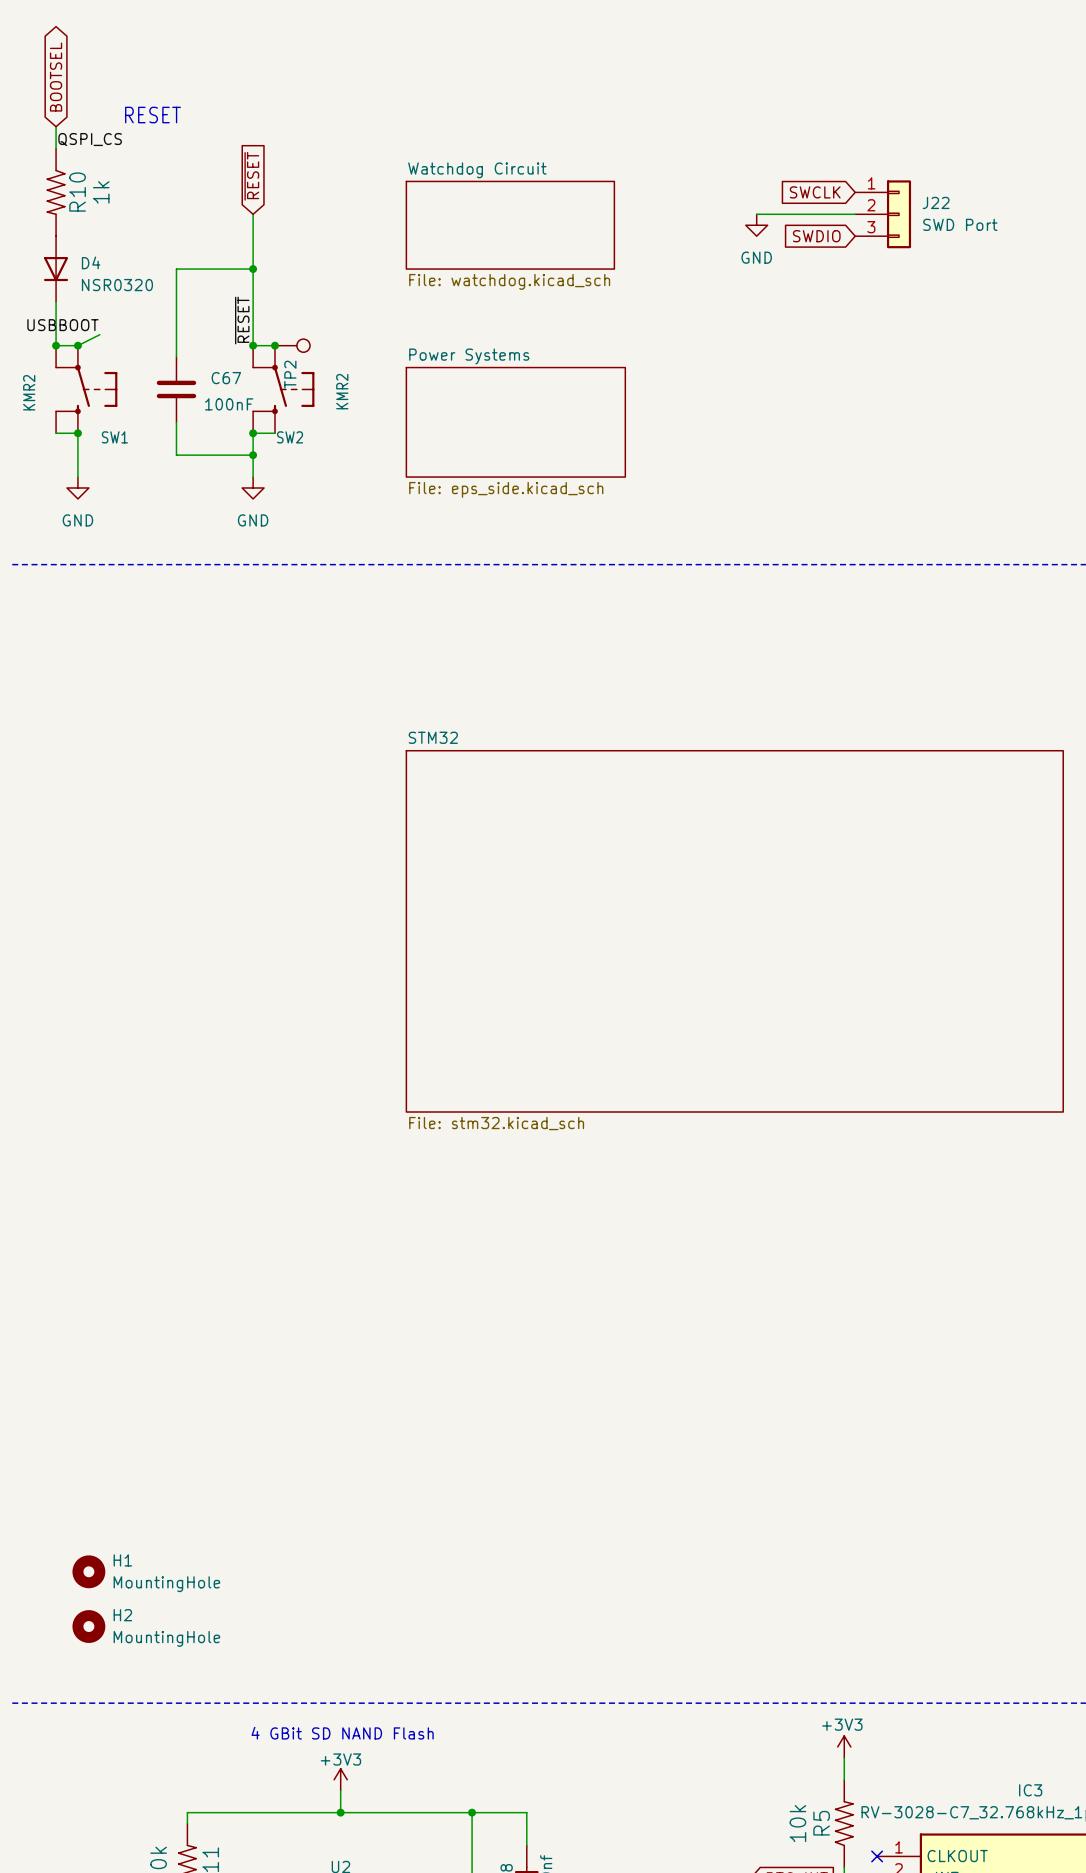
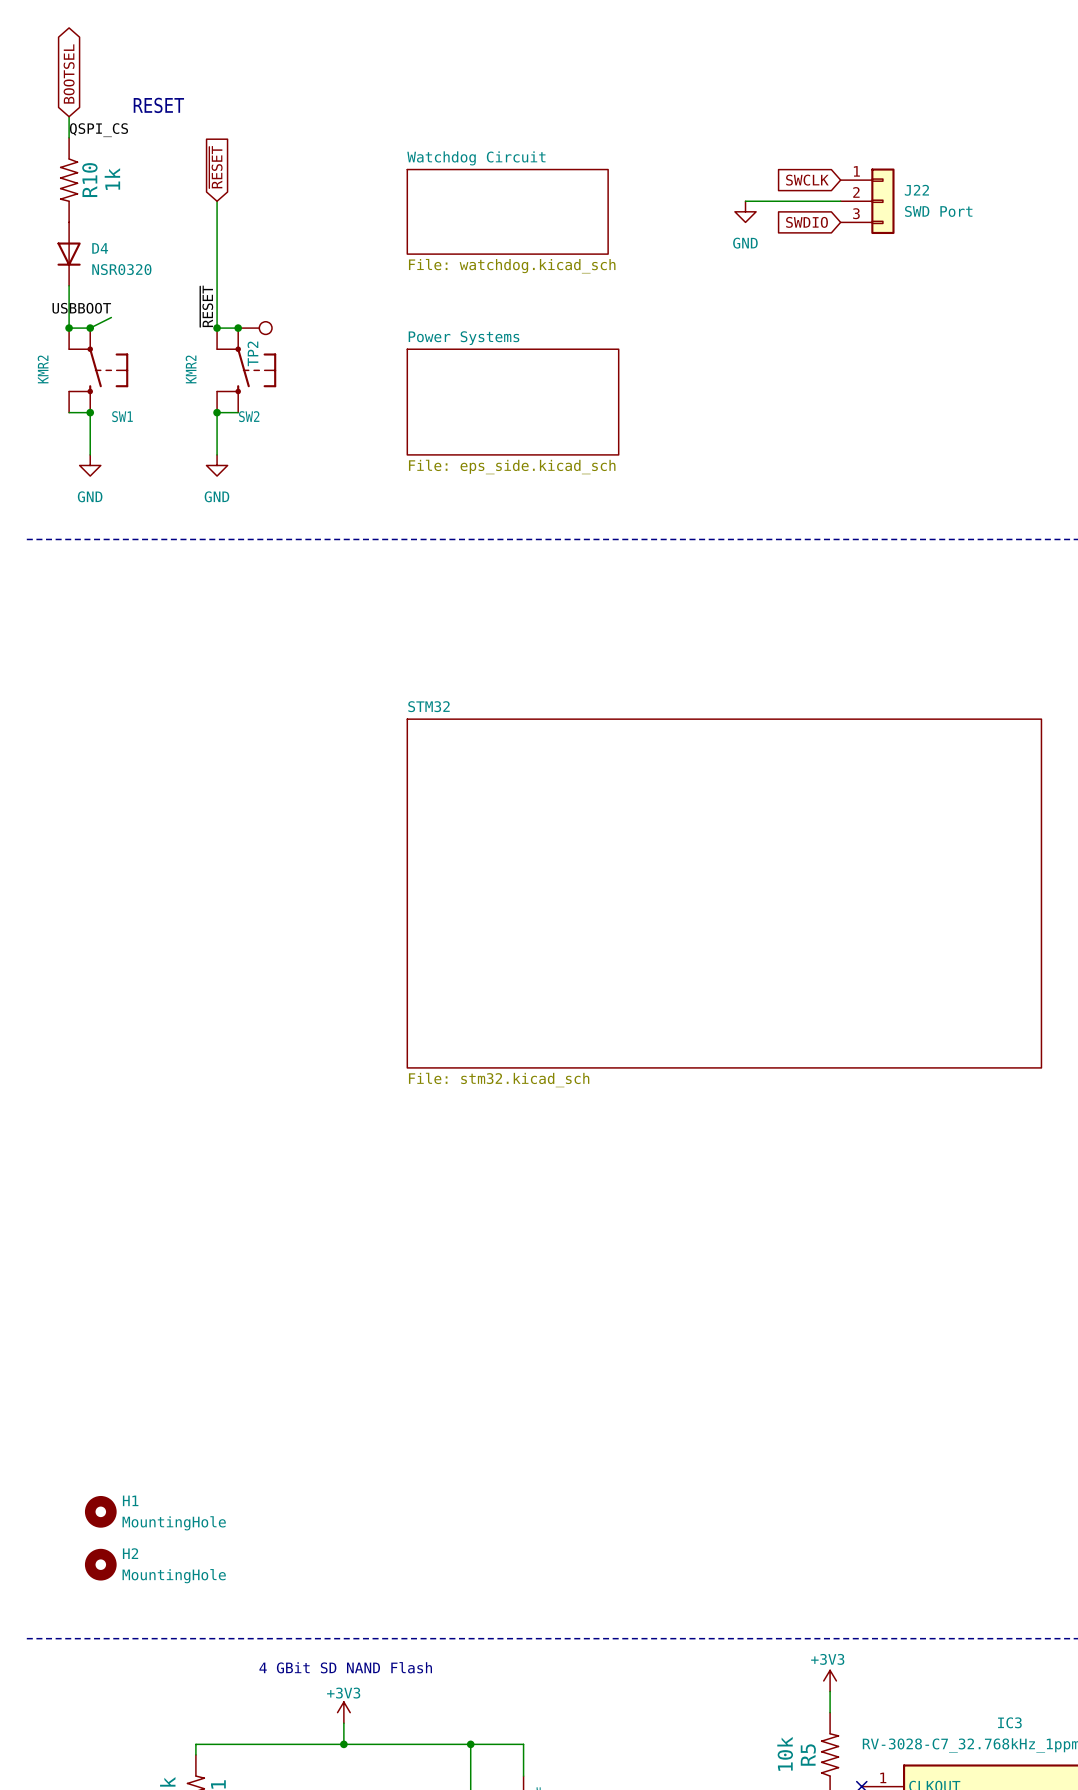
global label position: ~{RESET} (251, 176) -> ~{RESET} (215, 167)
wire: (253, 214) (253, 345) (275, 345) -> (217, 201) (217, 328) (238, 328)
wire: (253, 269) (176, 269) (176, 356) -> none
junction: (253, 269) -> none
label position: ~{RESET} (242, 320) -> ~{RESET} (206, 306)
junction: none -> (217, 328)
junction: none -> (238, 328)
junction: (253, 345) -> none
junction: (275, 345) -> none
TP2 position: (292, 345) -> (255, 328)
C67: 100nF (176, 389) -> none
SW2 position: (283, 389) -> (246, 370)
SW2 value position: KMR2 (342, 391) -> KMR2 (191, 369)
wire: (176, 422) (176, 455) (253, 455) -> none
junction: none -> (217, 412)
junction: (253, 433) -> none
wire: (275, 433) (253, 433) (253, 477) -> (238, 412) (217, 412) (217, 454)
junction: (253, 455) -> none
power symbol position: GND (253, 487) -> GND (217, 465)

